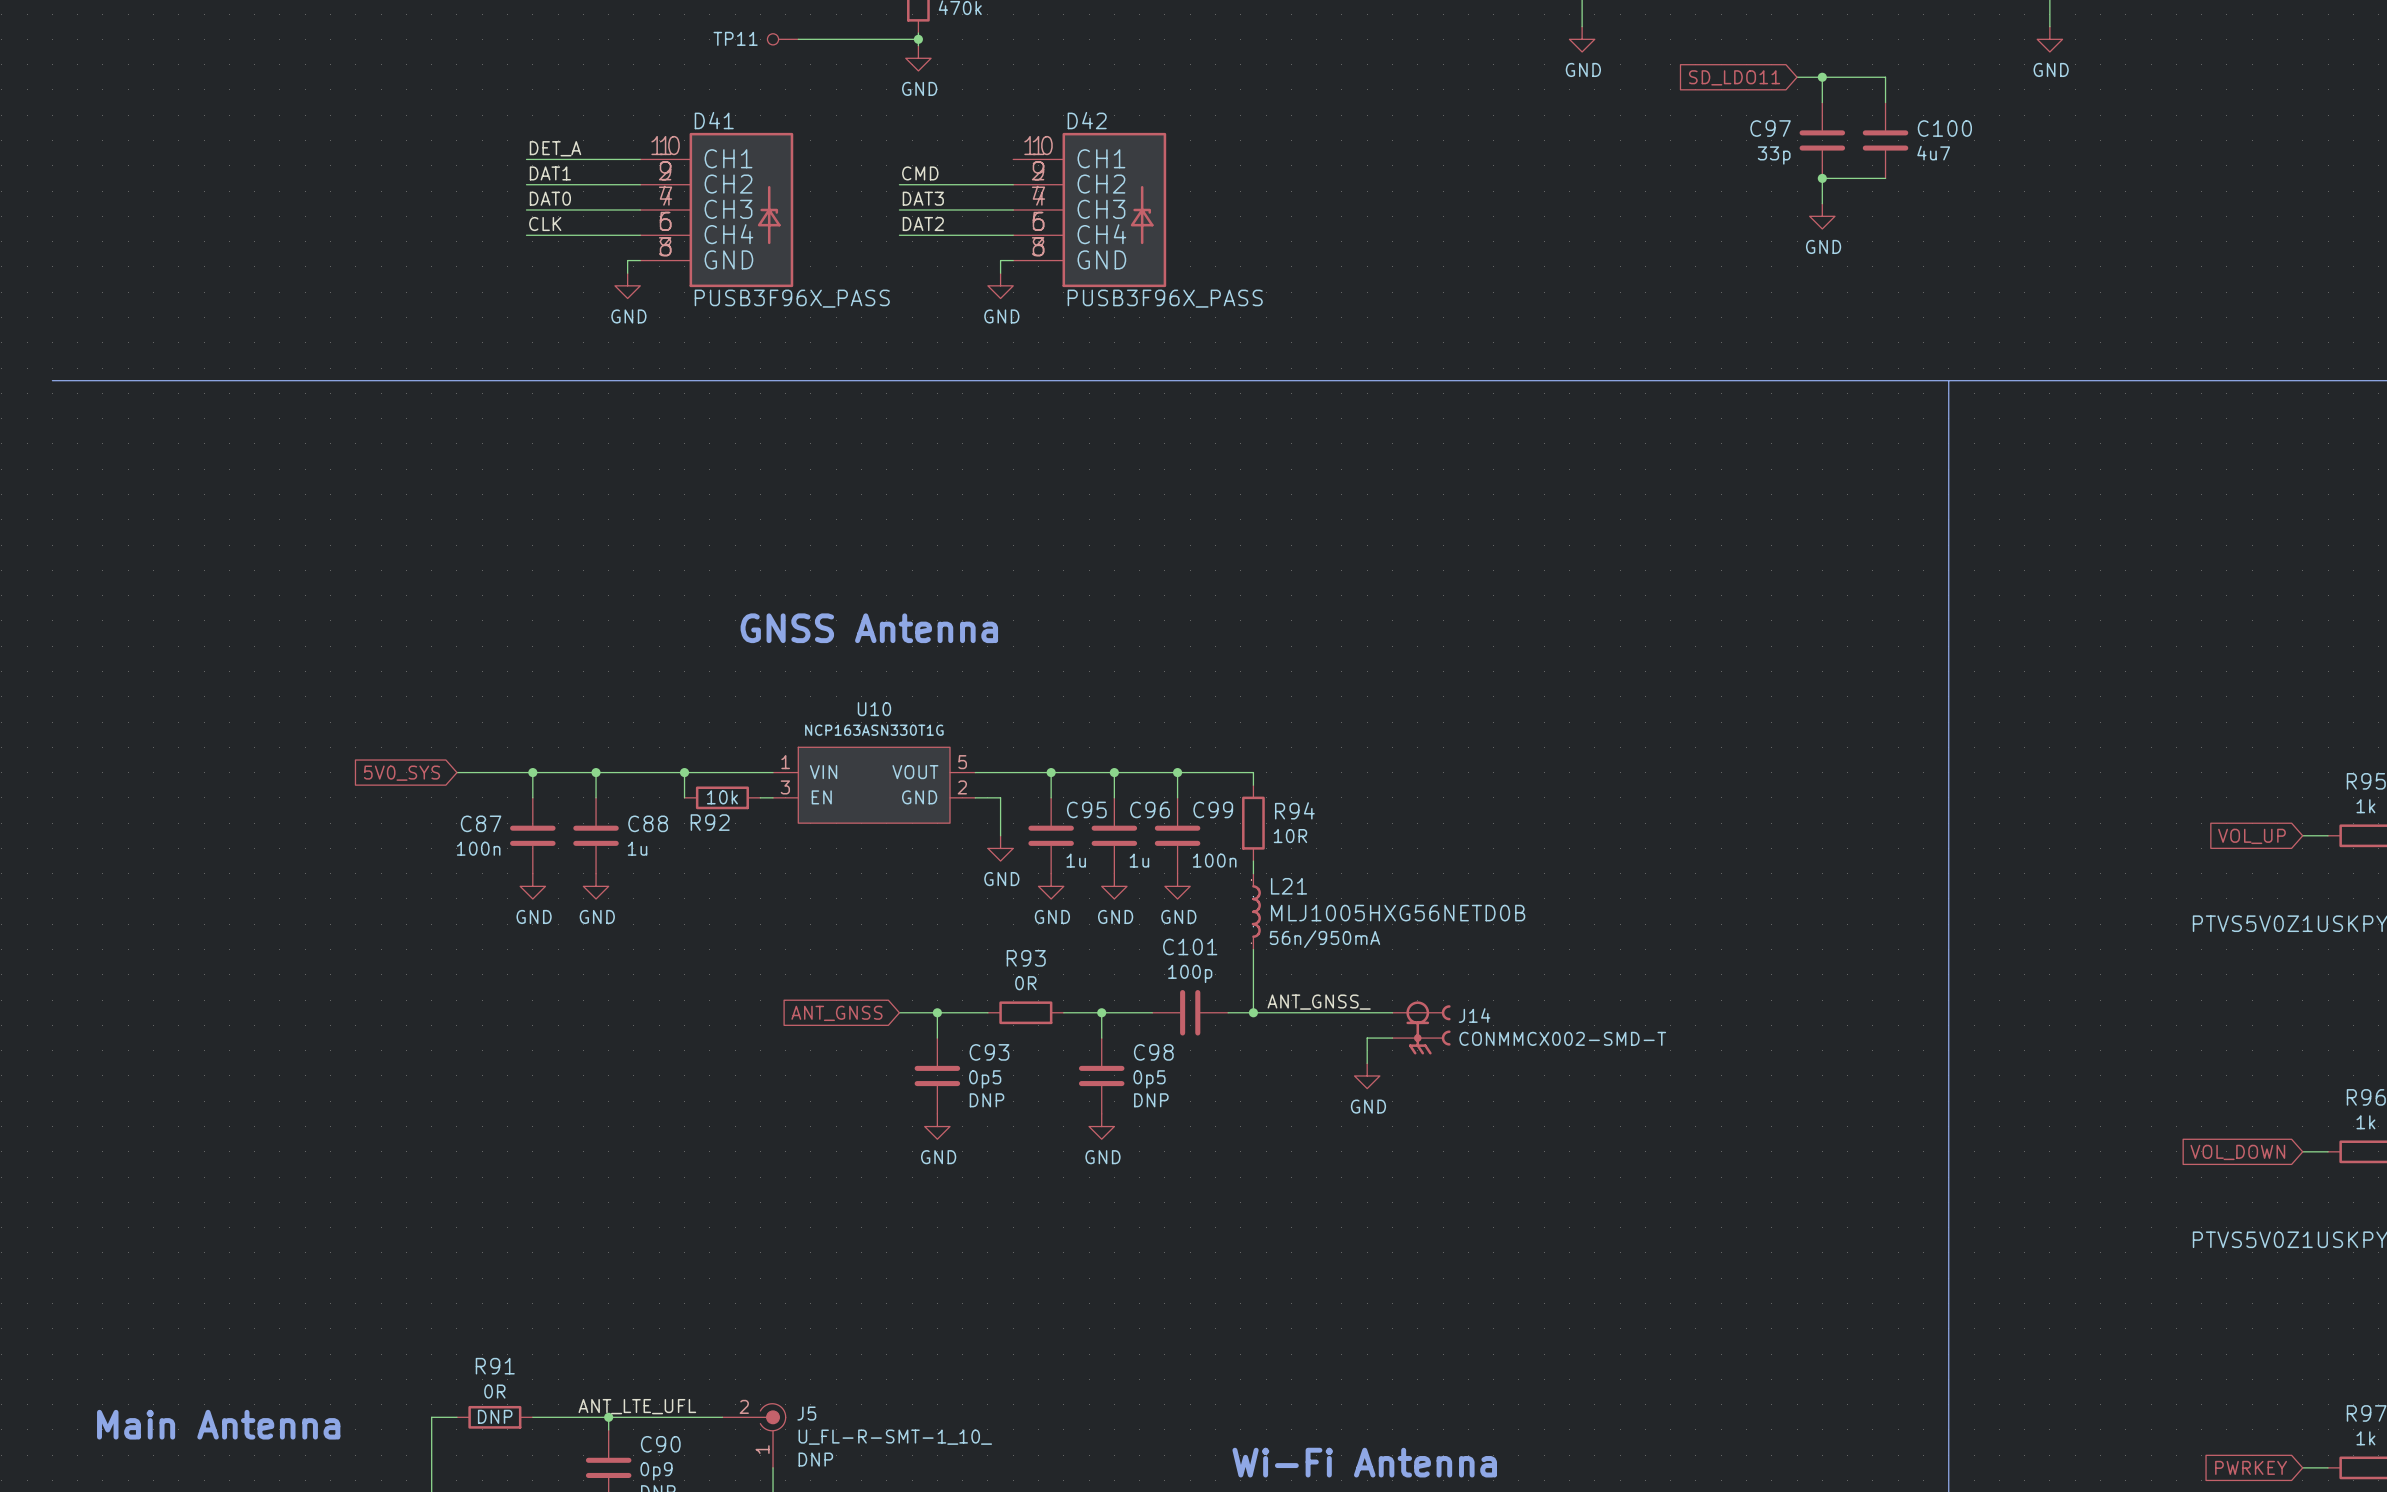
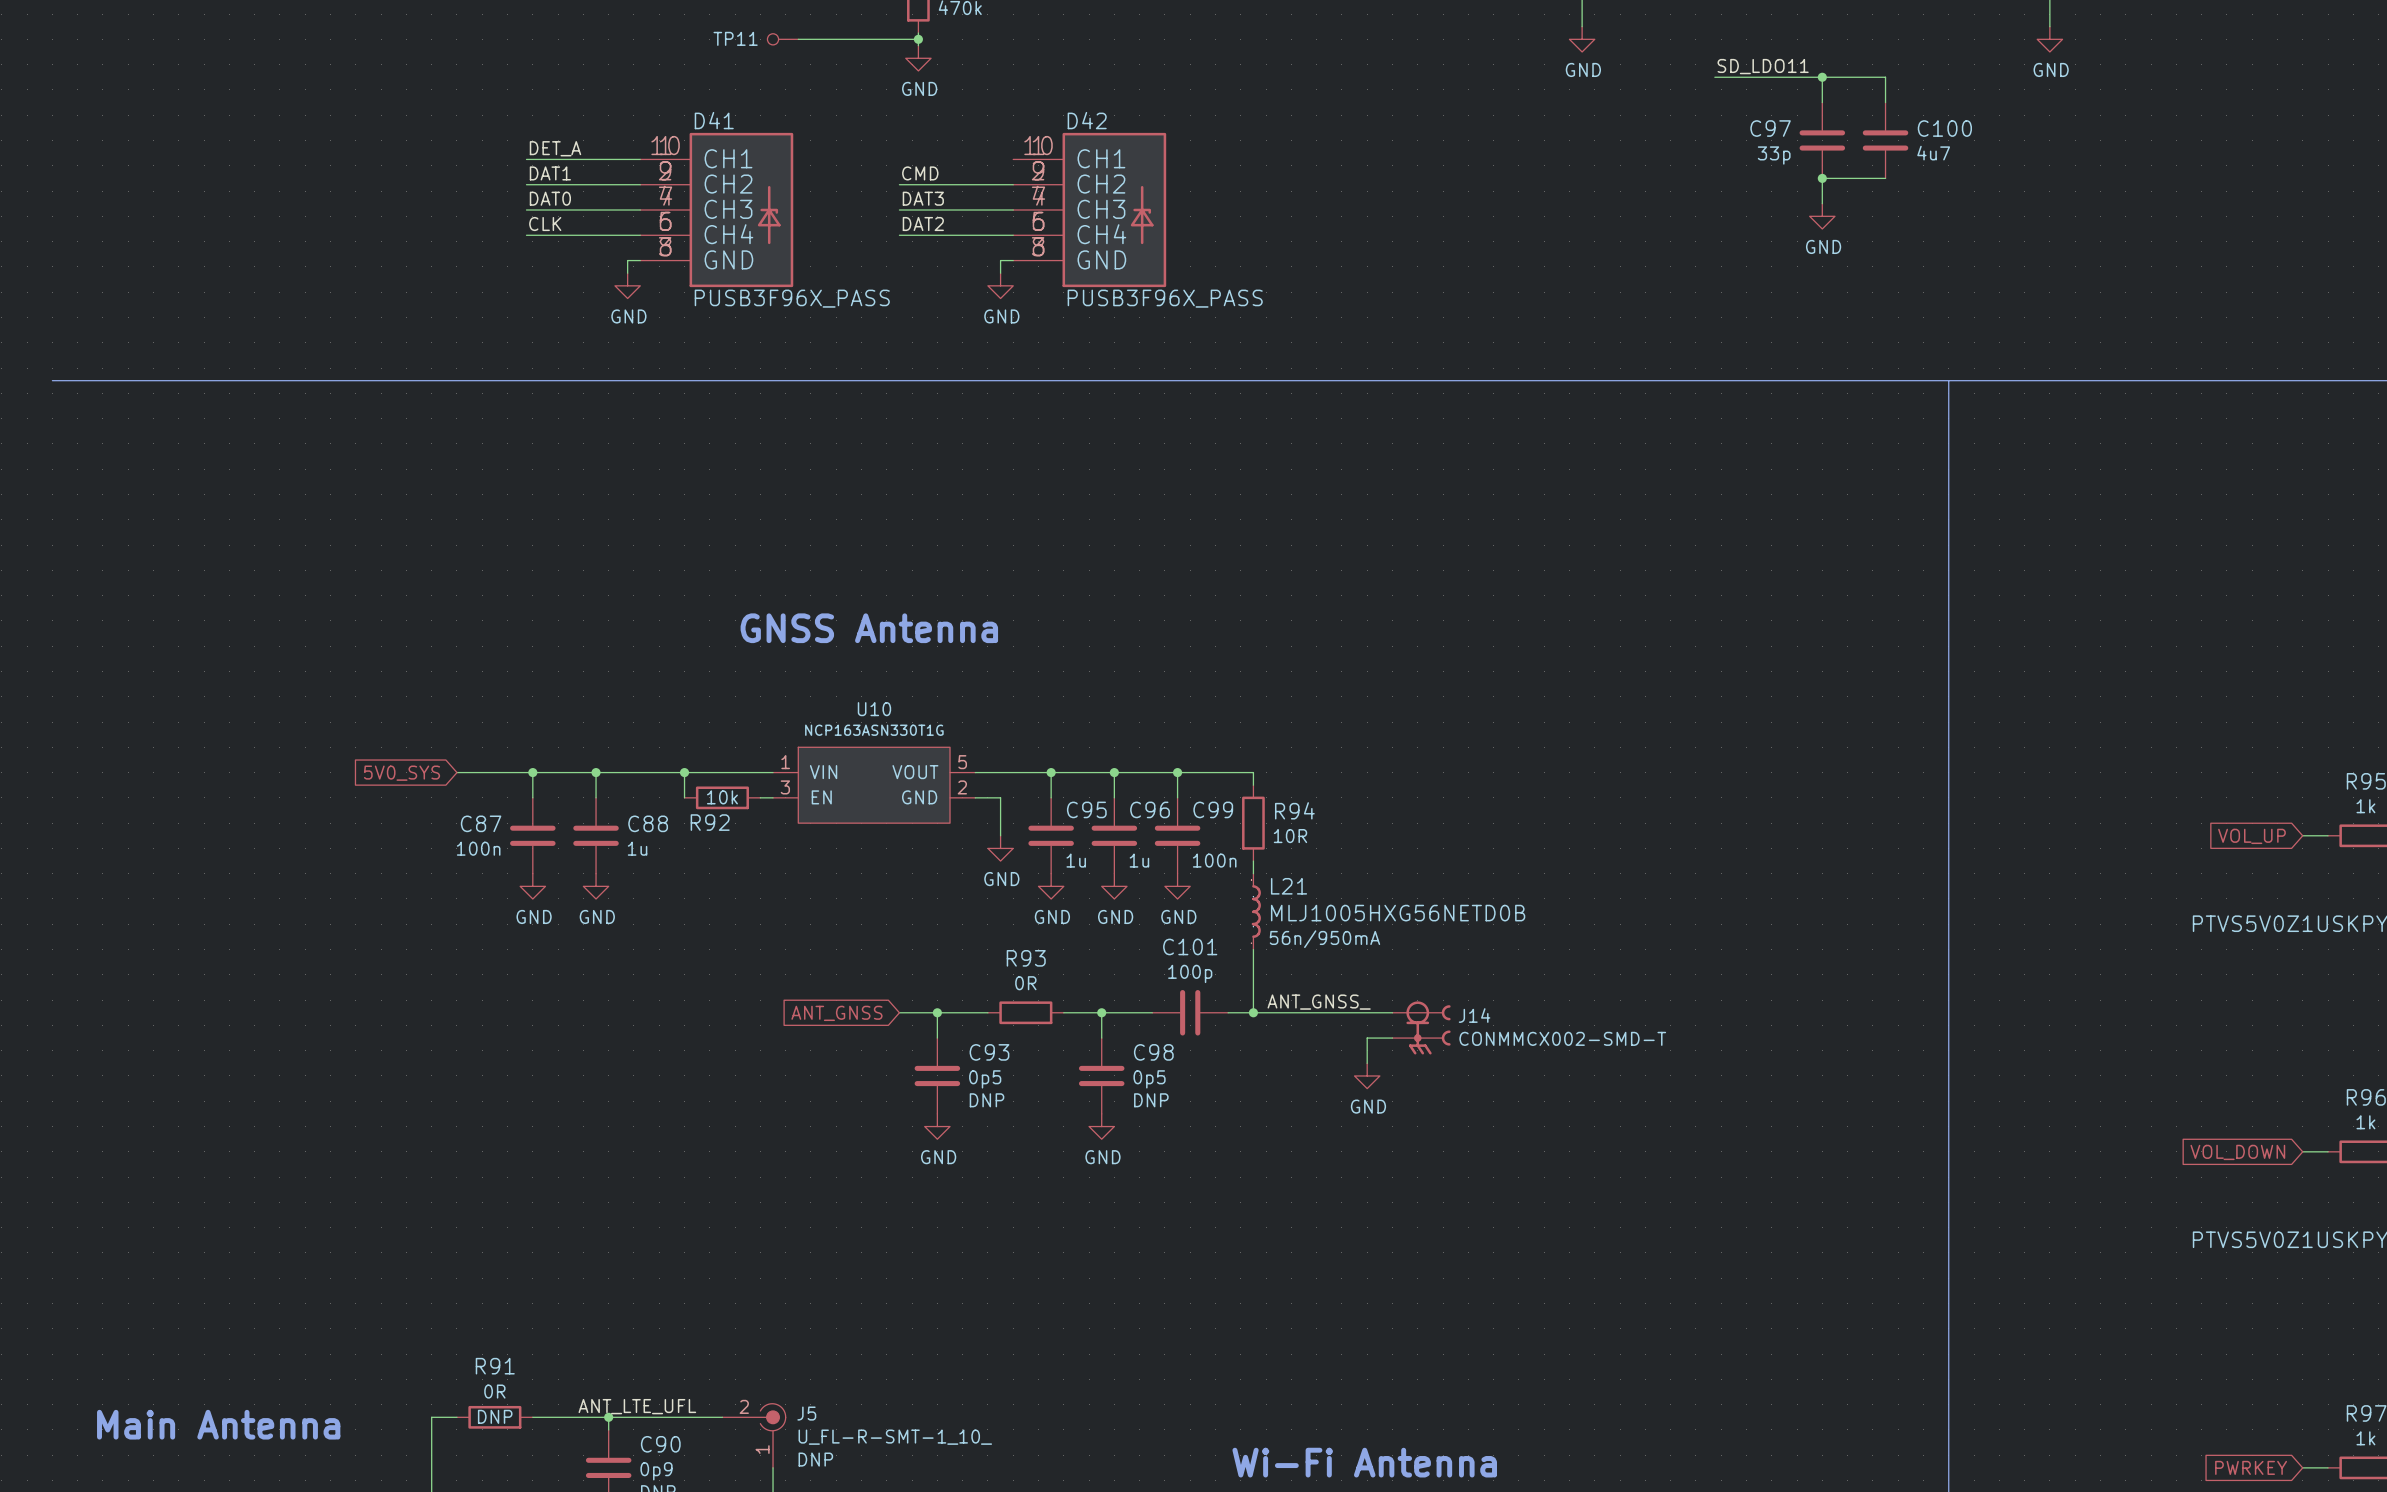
label: none -> SD_LDO11 (1763, 66)
wire: none -> (1714, 77) (1797, 77)
global label: SD_LDO11 (1734, 77) -> none

